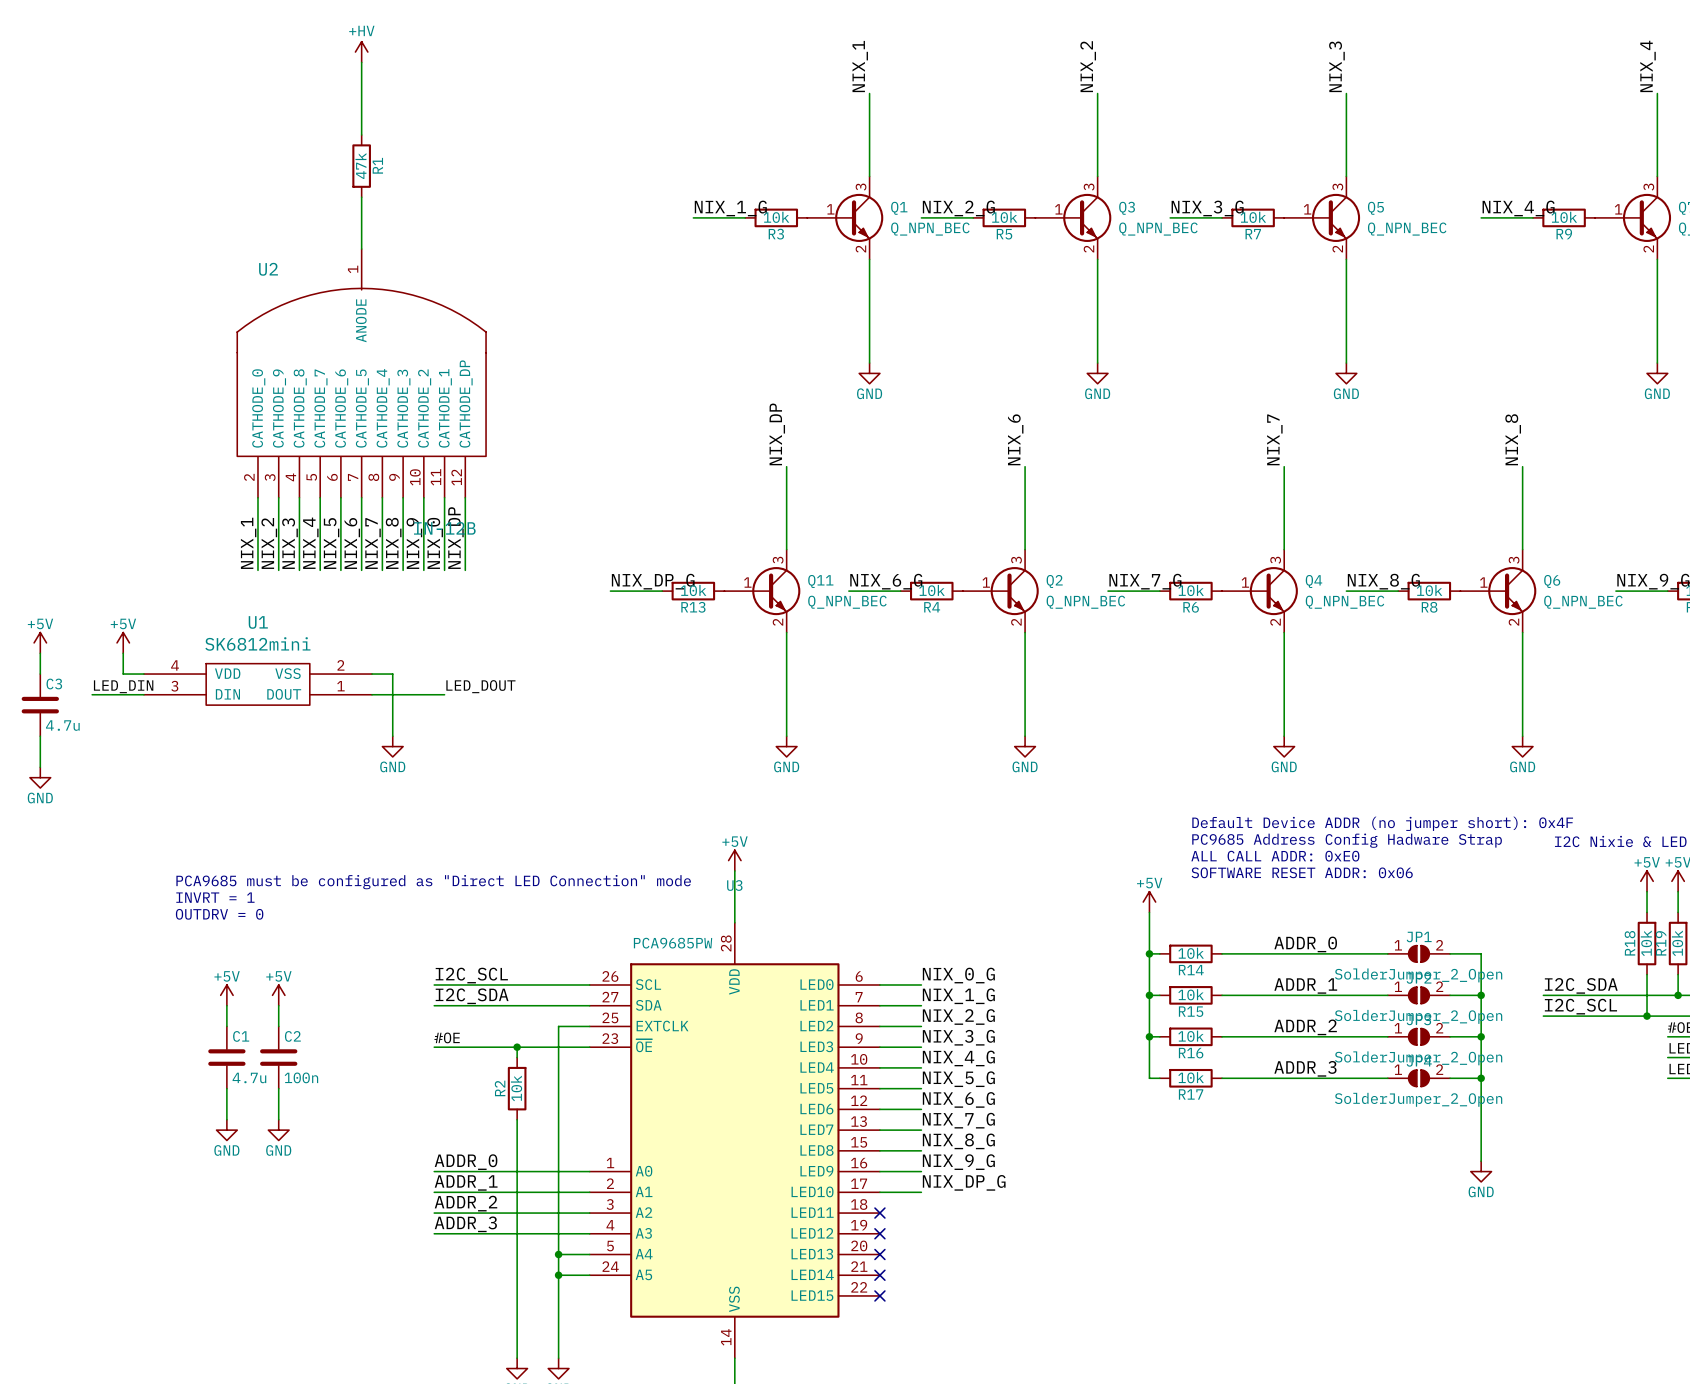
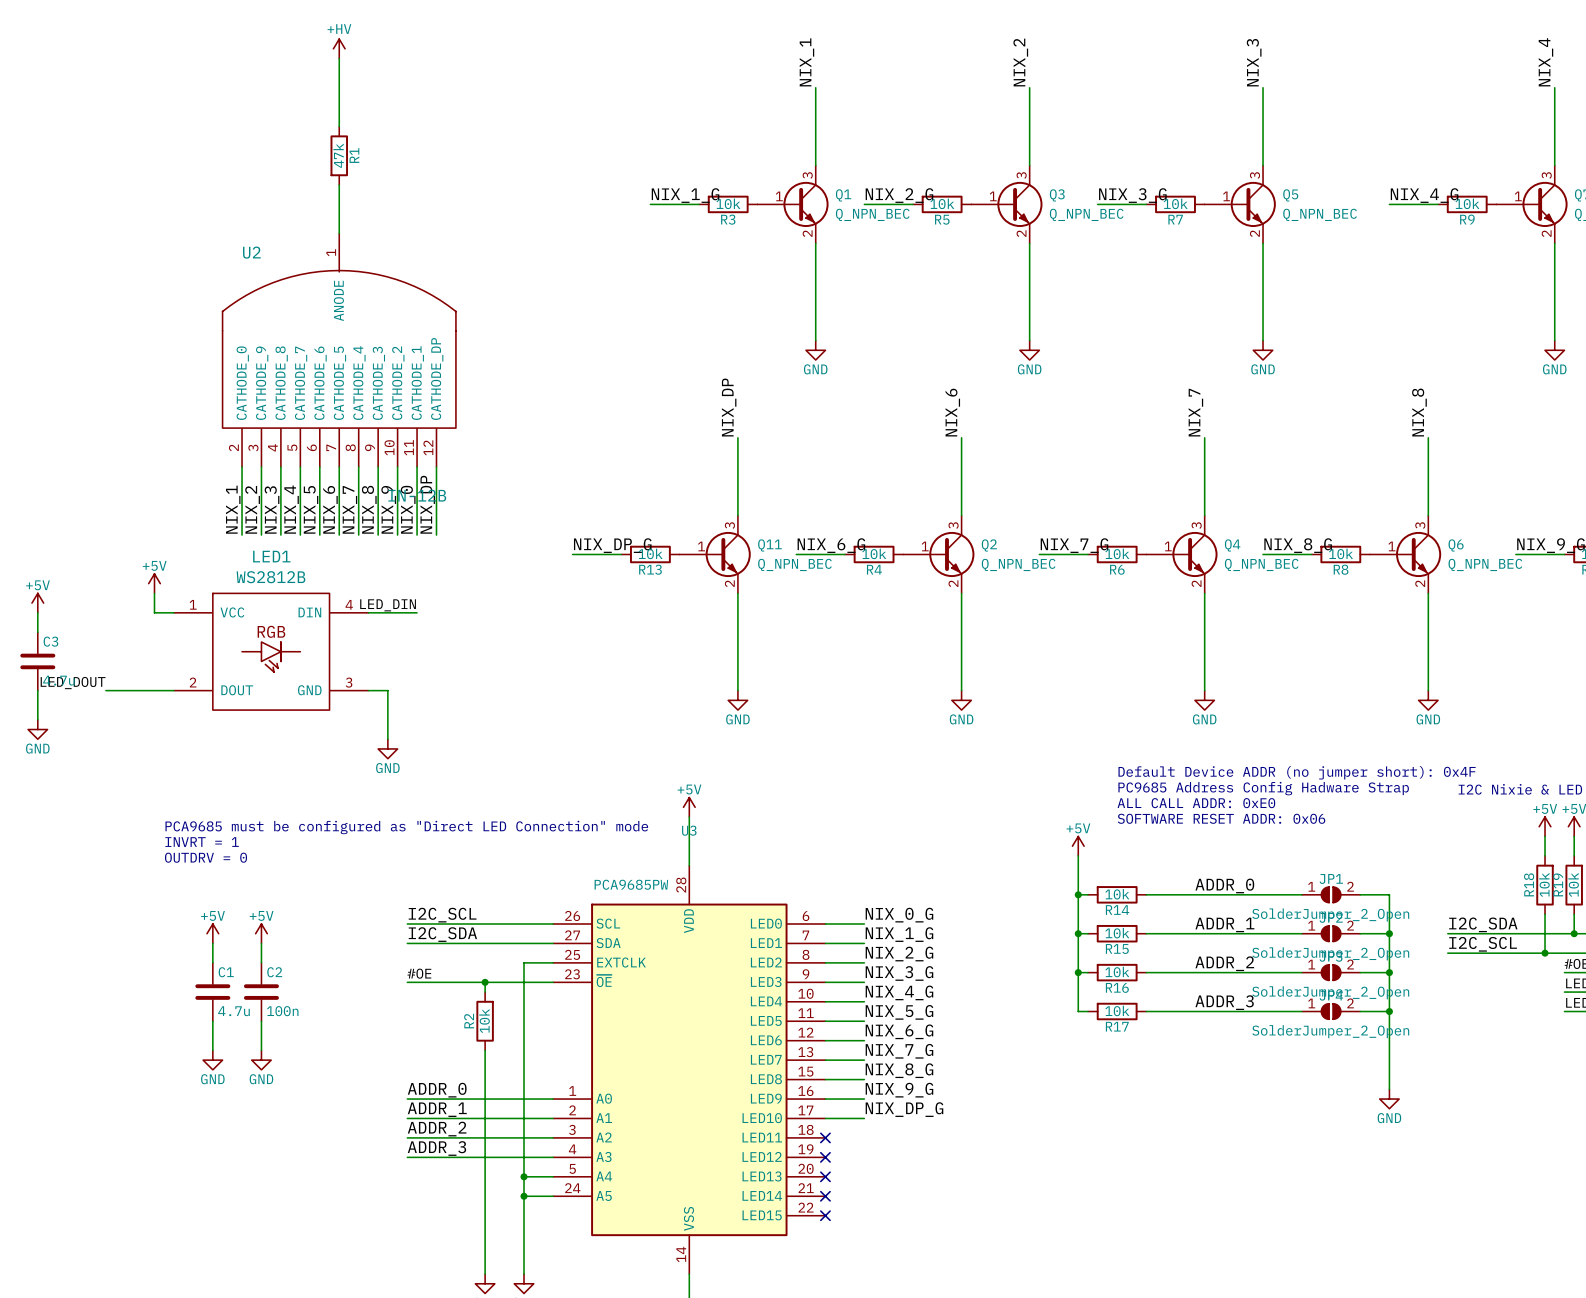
power symbol position: +5V (123, 642) -> +5V (154, 583)
label: none -> LED_DIN (388, 605)
wire: (123, 653) (123, 674) (143, 674) -> (154, 593) (154, 612) (173, 612)
wire: none -> (368, 612) (417, 612)
wire: (372, 674) (392, 674) (392, 736) -> (387, 739) (387, 690) (368, 690)
U1: SK6812mini (257, 684) -> none
label: LED_DIN (123, 686) -> none
label: LED_DOUT (480, 686) -> none
wire: (92, 694) (143, 694) -> none
LED1: none -> WS2812B (271, 651)
wire: (372, 694) (444, 694) -> none
label: none -> LED_DOUT (73, 683)
wire: none -> (105, 690) (173, 690)
power symbol position: GND (392, 746) -> GND (387, 748)

